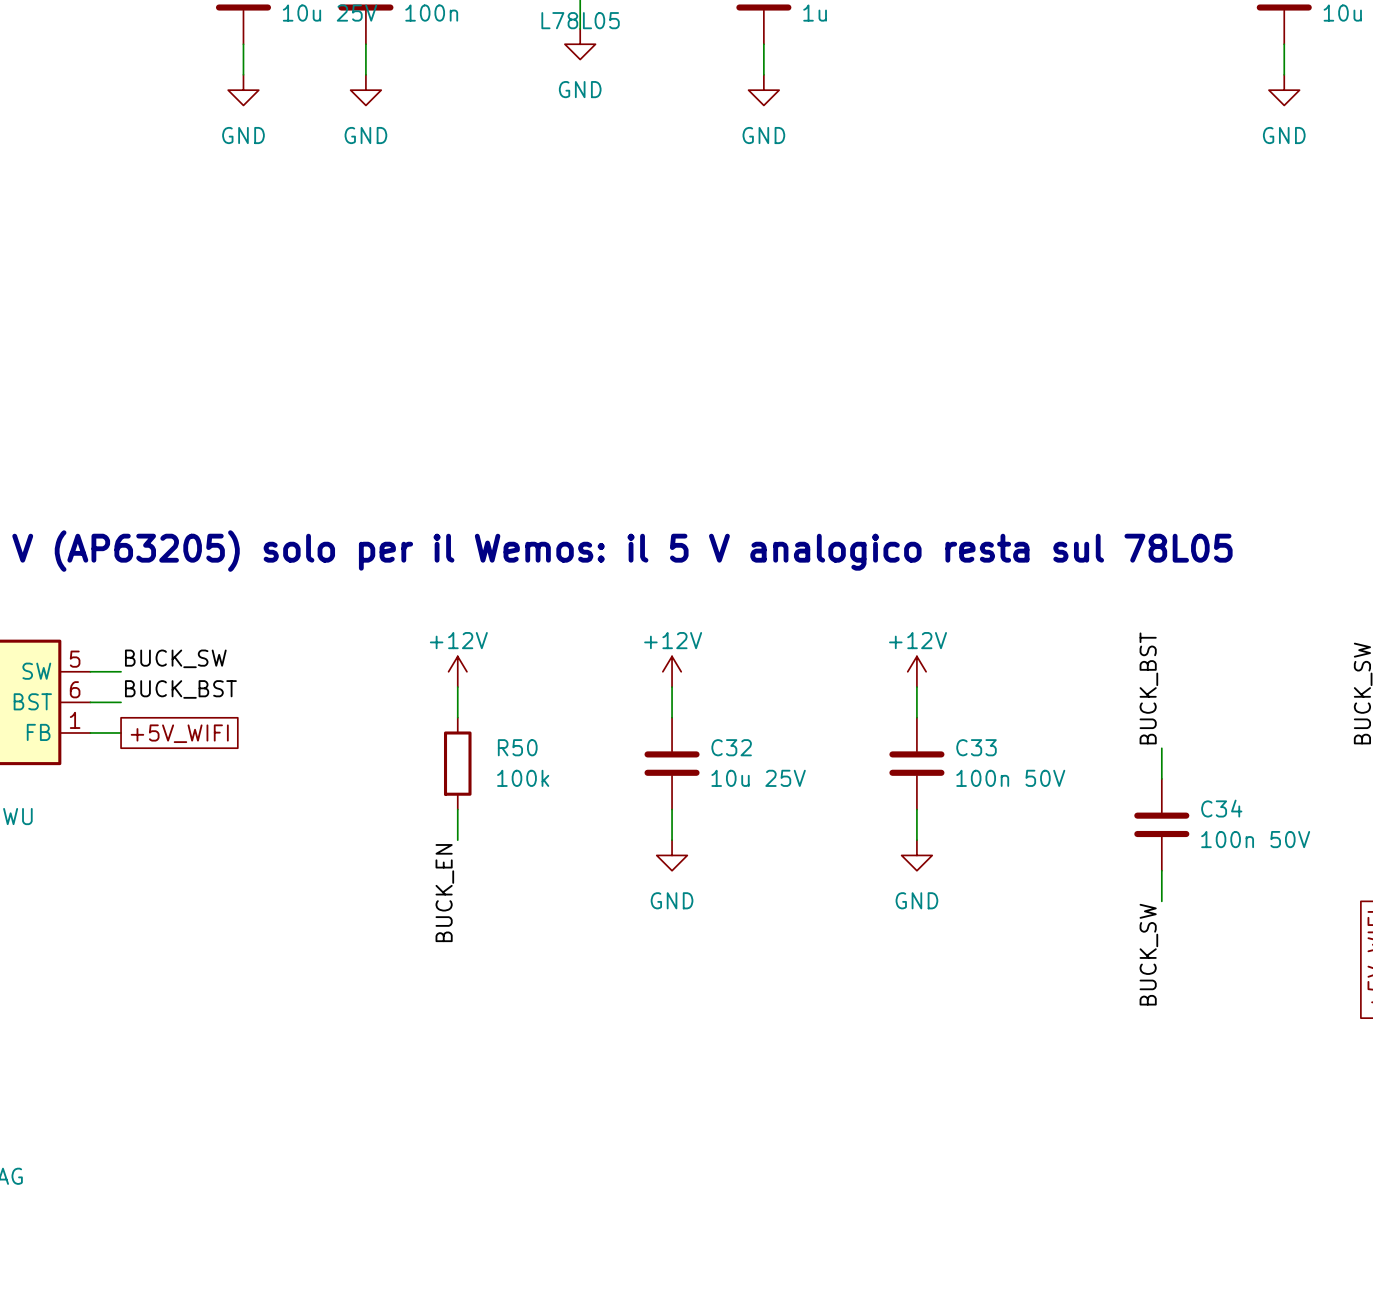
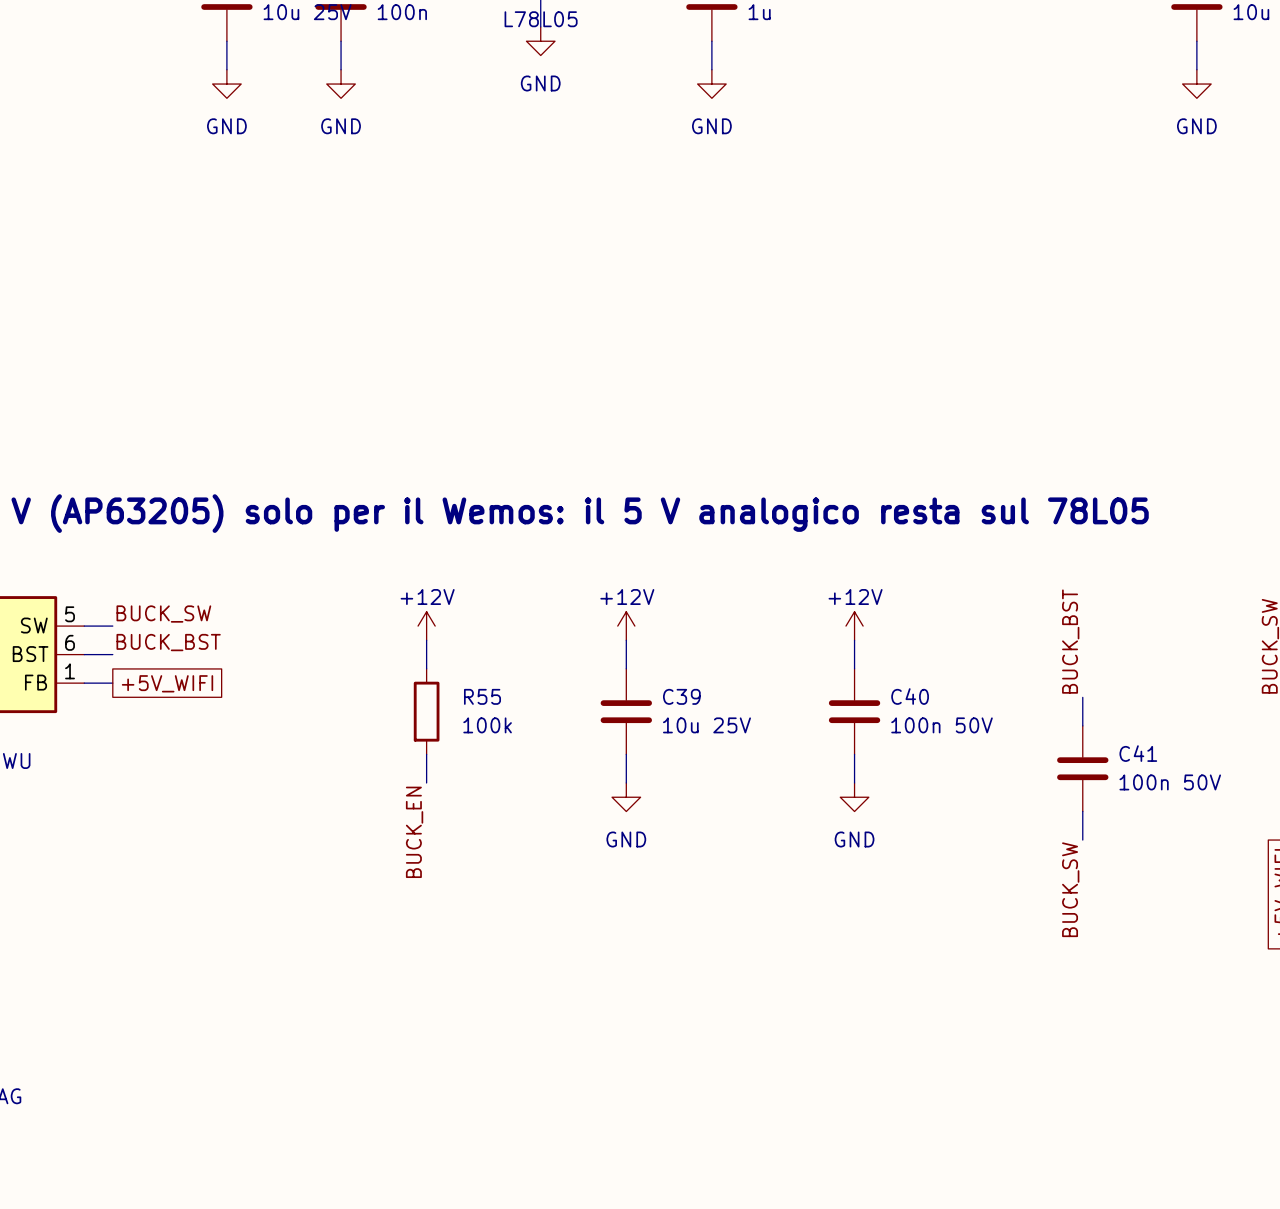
R50 name: R50 (517, 747) -> R55 (482, 696)
C32 name: C32 (731, 747) -> C39 (681, 696)
C33 name: C33 (976, 747) -> C40 (910, 696)
C34 name: C34 (1221, 808) -> C41 (1138, 753)

